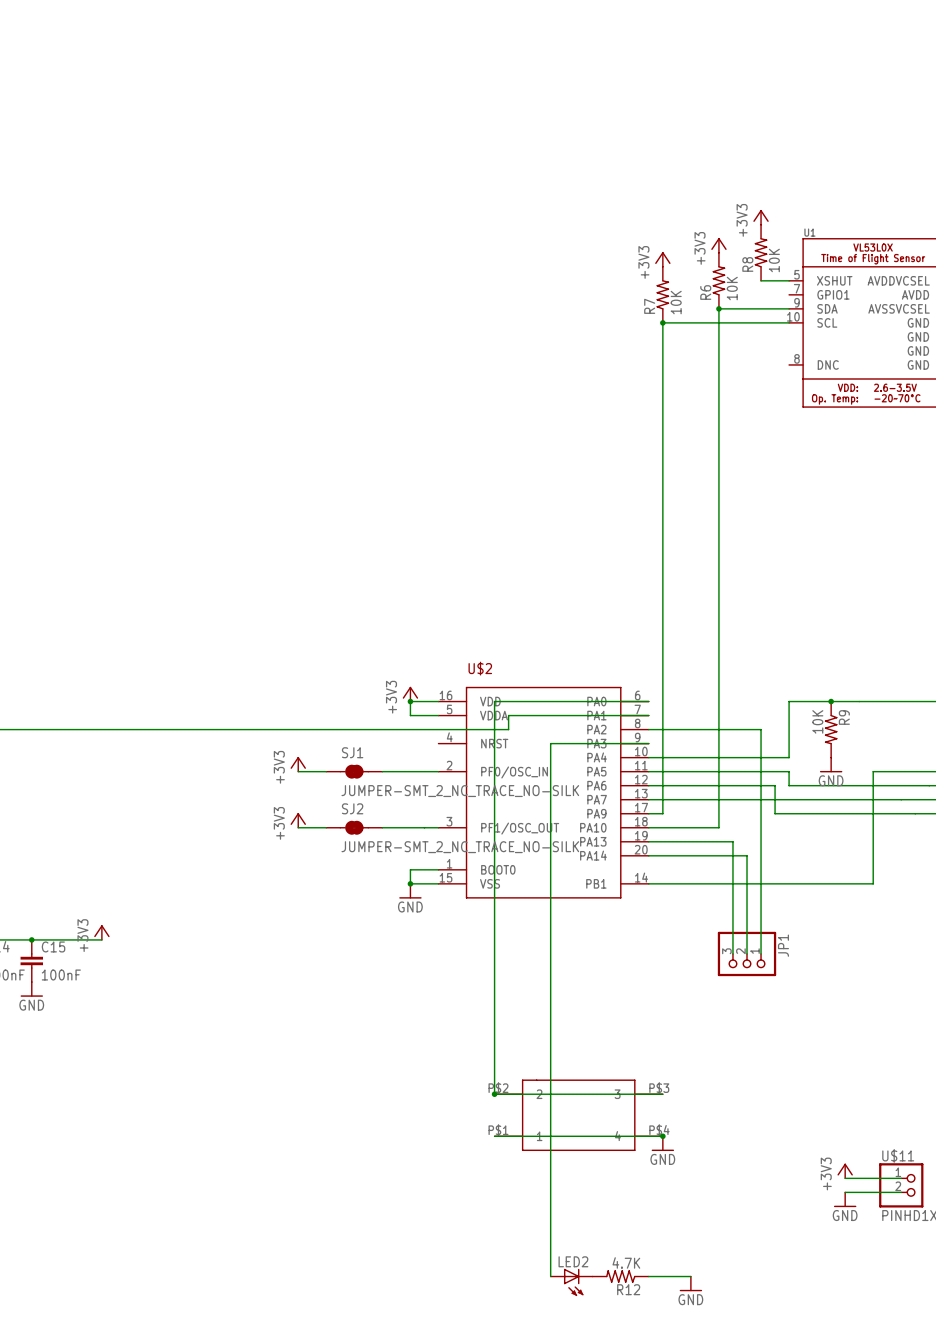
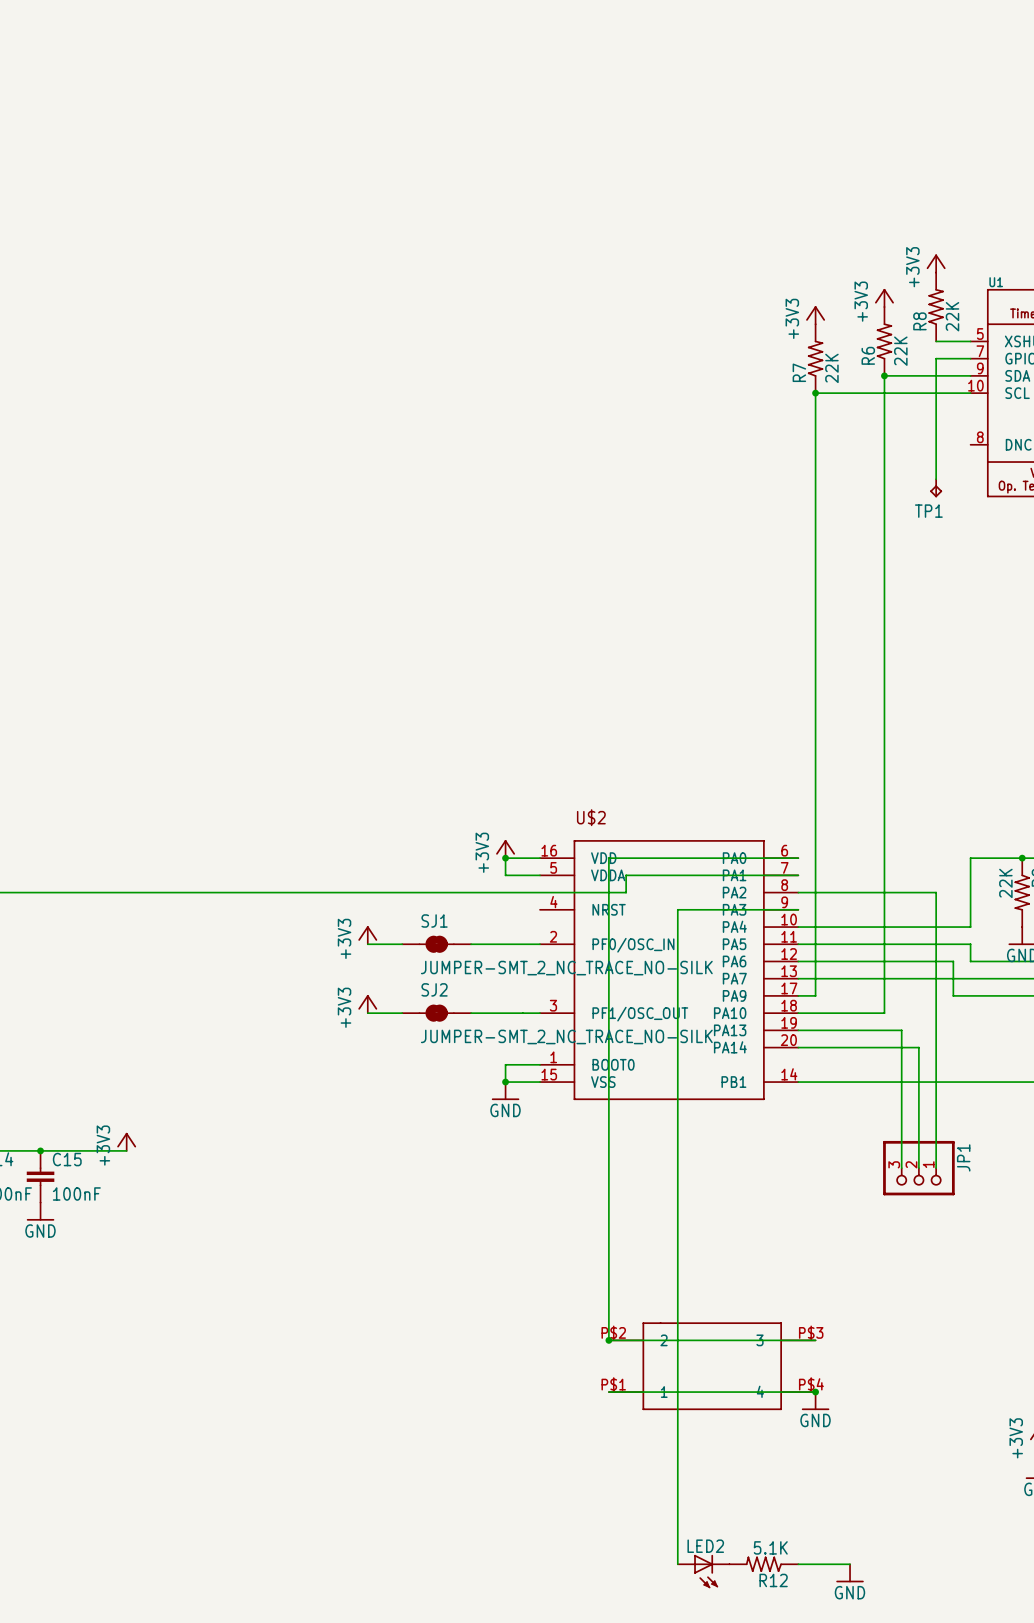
R8 value: 10K (774, 260) -> 22K (952, 316)
R6 value: 10K (732, 288) -> 22K (900, 351)
wire: none -> (970, 358) (936, 358) (936, 479)
R7 value: 10K (676, 302) -> 22K (831, 368)
TP1: none -> (936, 488)
R9 value: 10K (817, 721) -> 22K (1005, 883)
R12 value: 4.7K (626, 1262) -> 5.1K (770, 1547)

